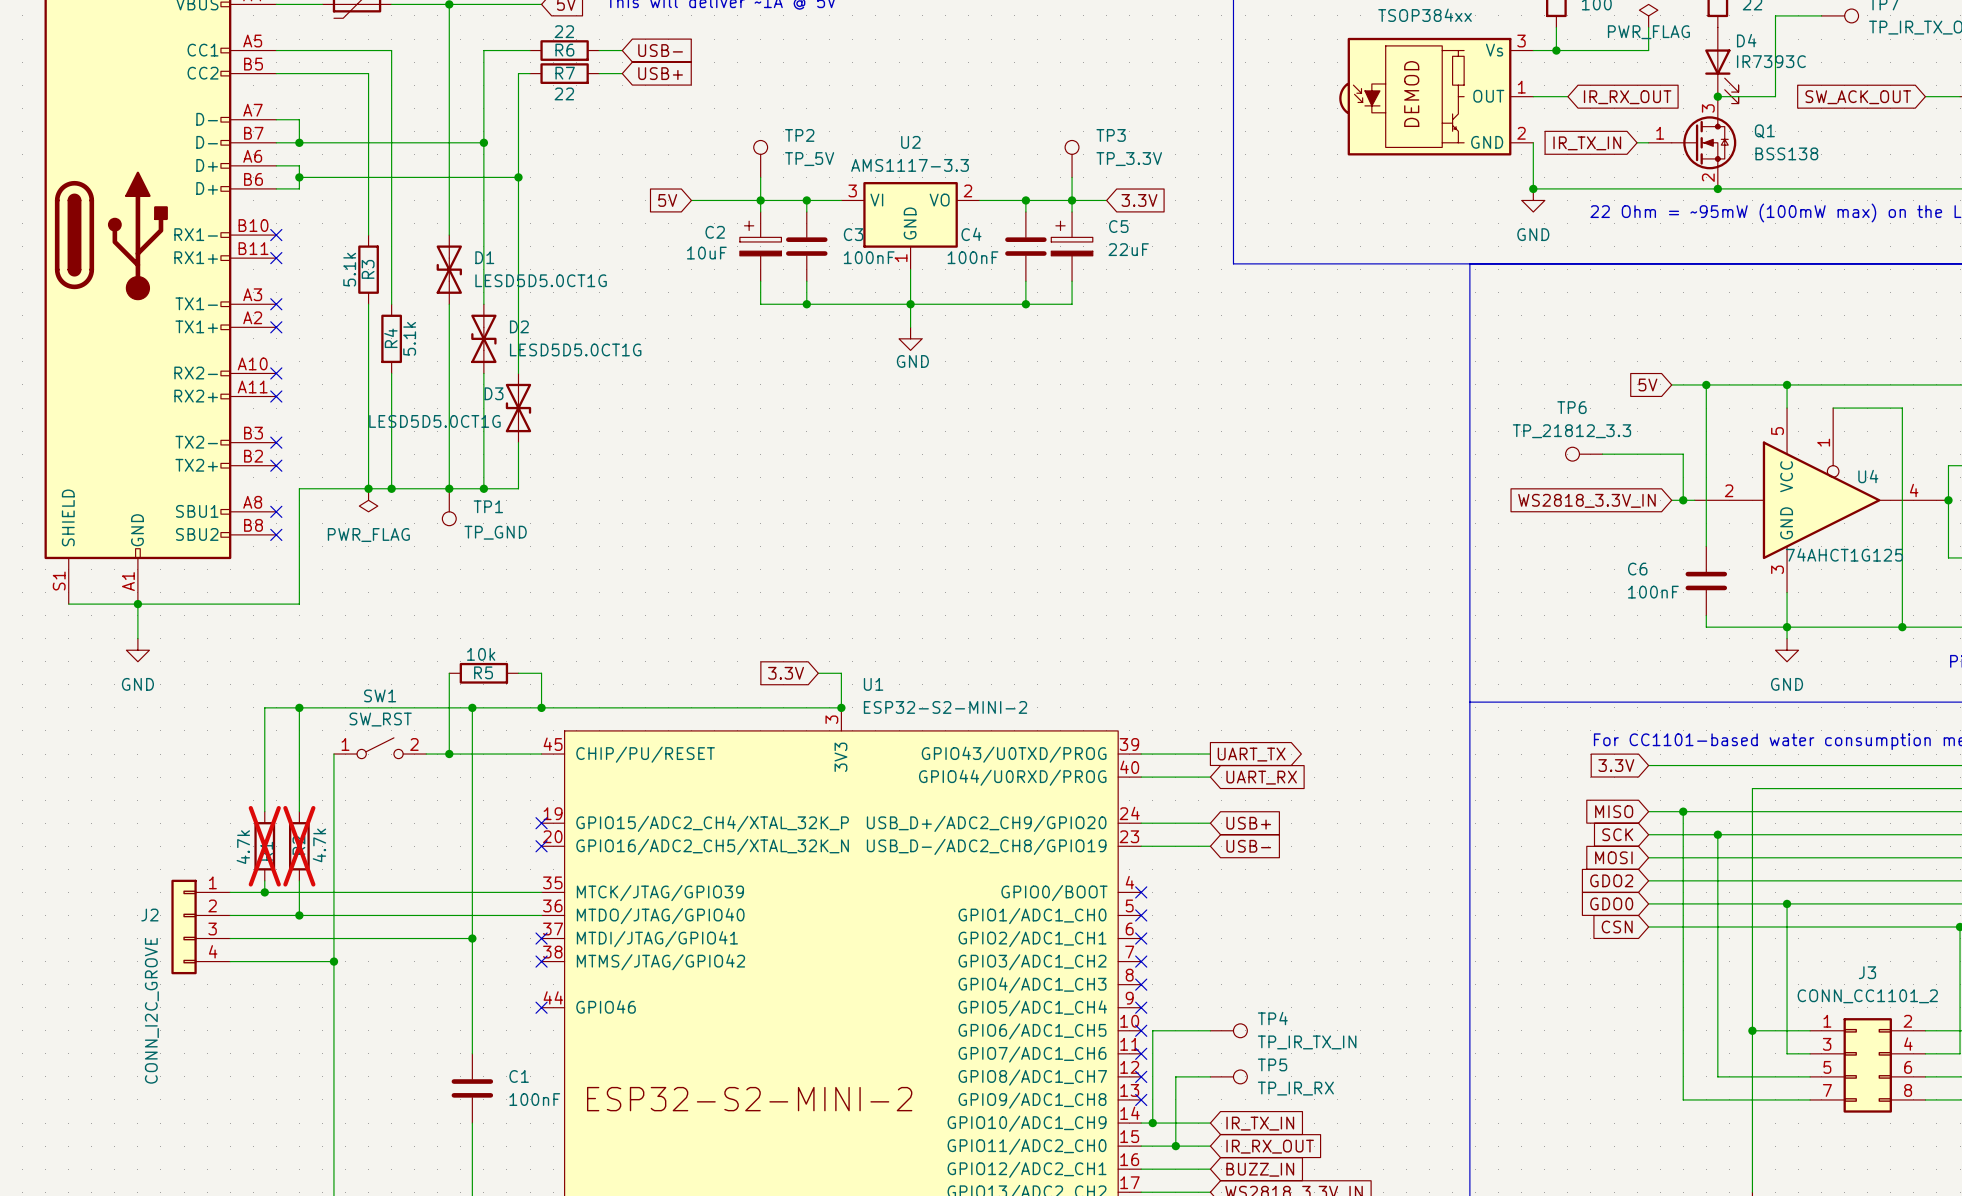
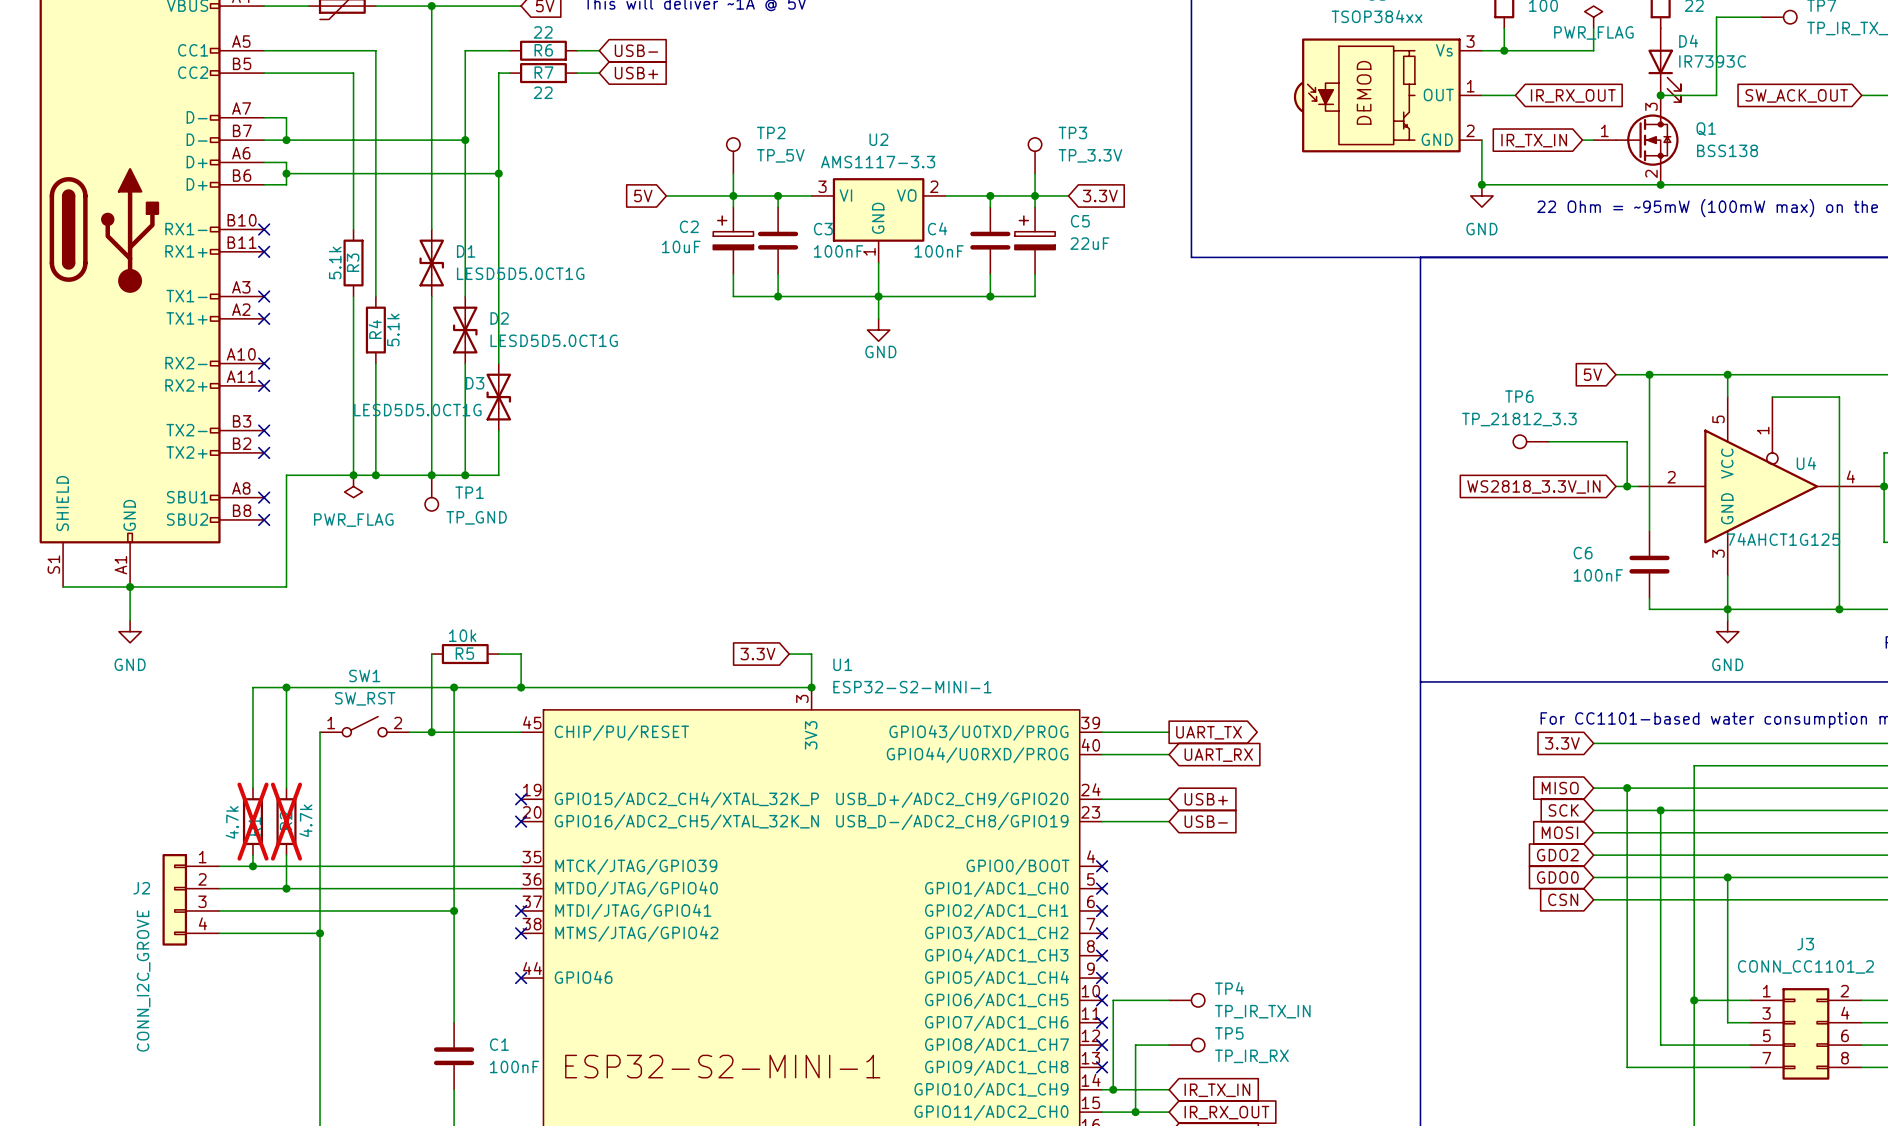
U1 value: ESP32-S2-MINI-2 (945, 707) -> ESP32-S2-MINI-1 (912, 687)
U1 text: ESP32-S2-MINI-2 (749, 1099) -> ESP32-S2-MINI-1 (722, 1066)

